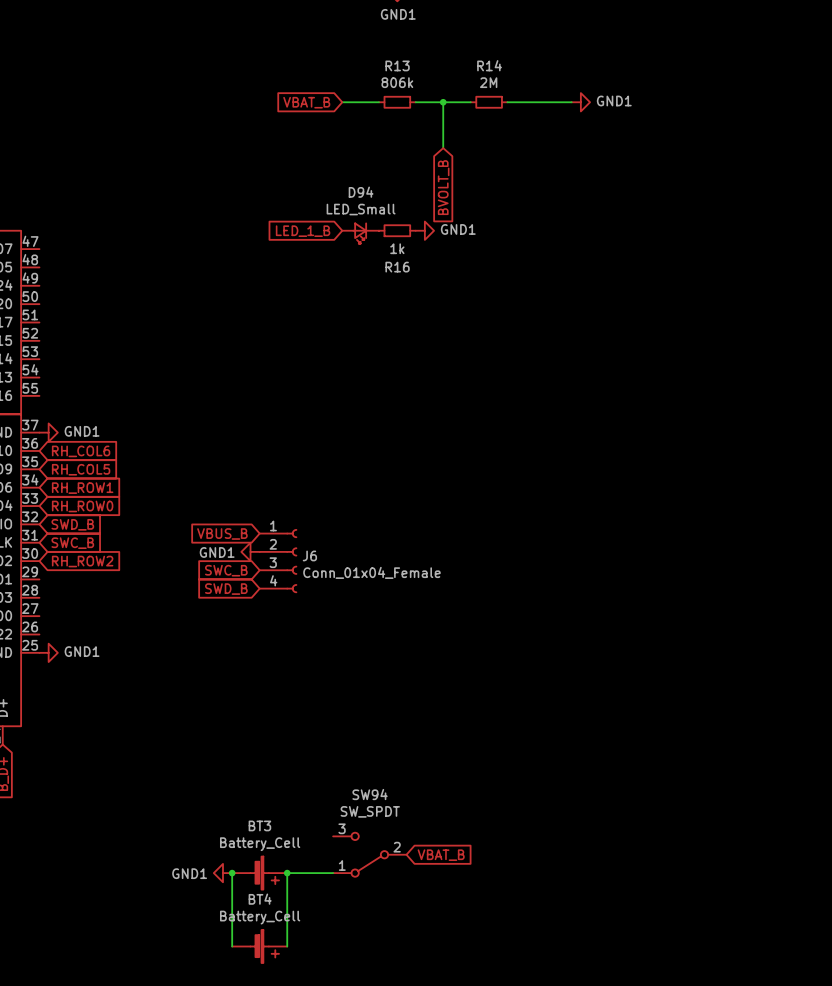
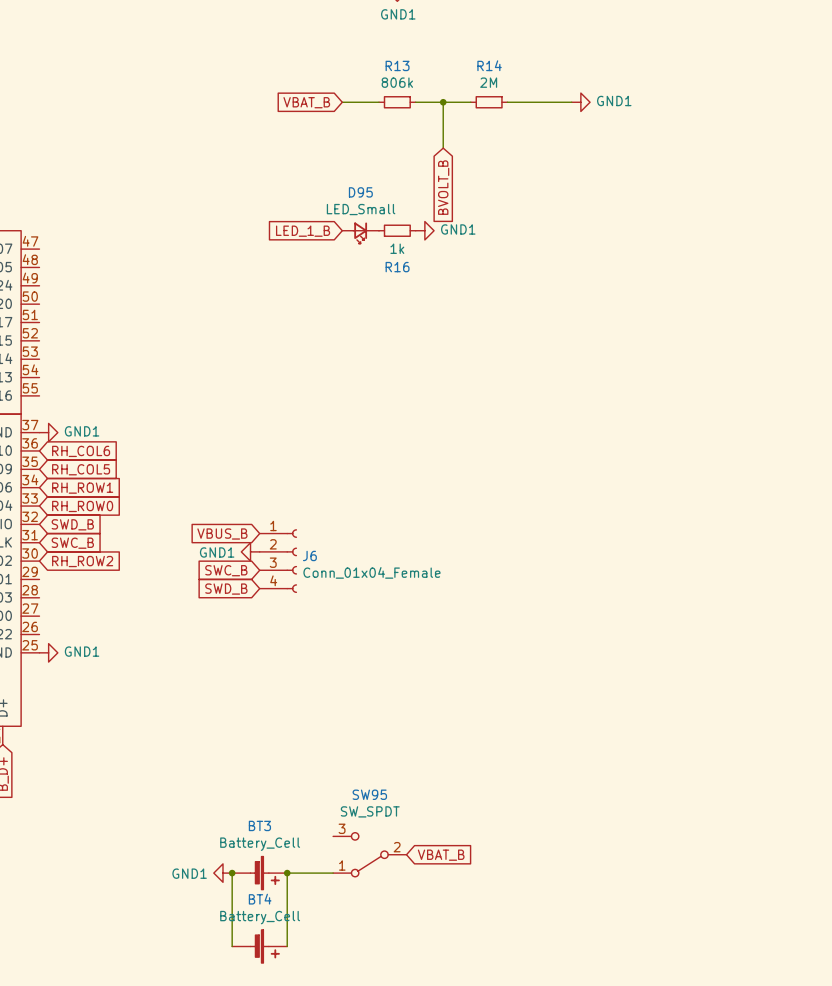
D94 name: D94 (361, 192) -> D95 (360, 192)
SW94 name: SW94 (370, 794) -> SW95 (369, 794)

